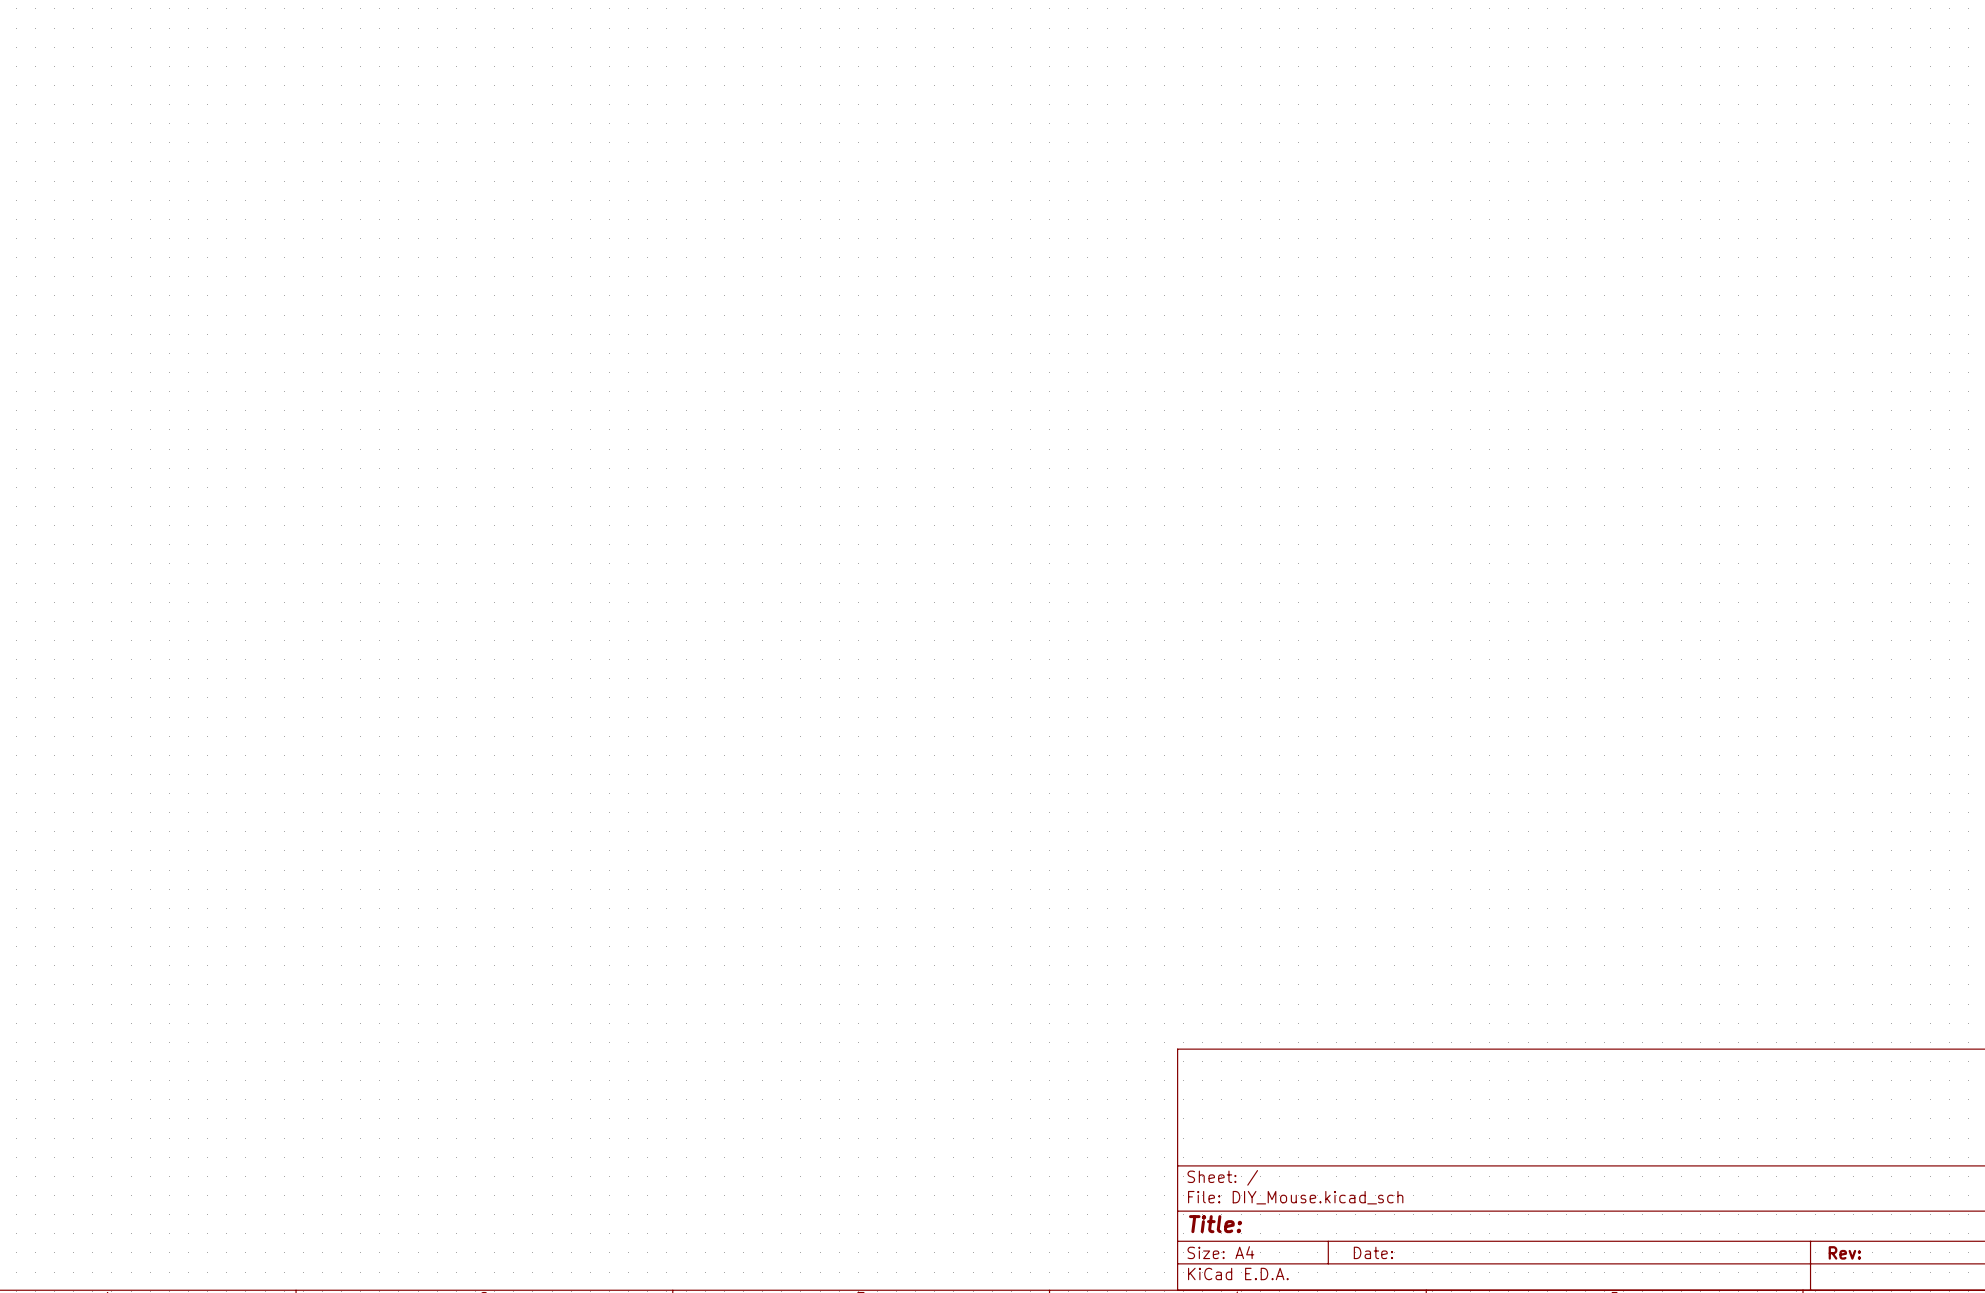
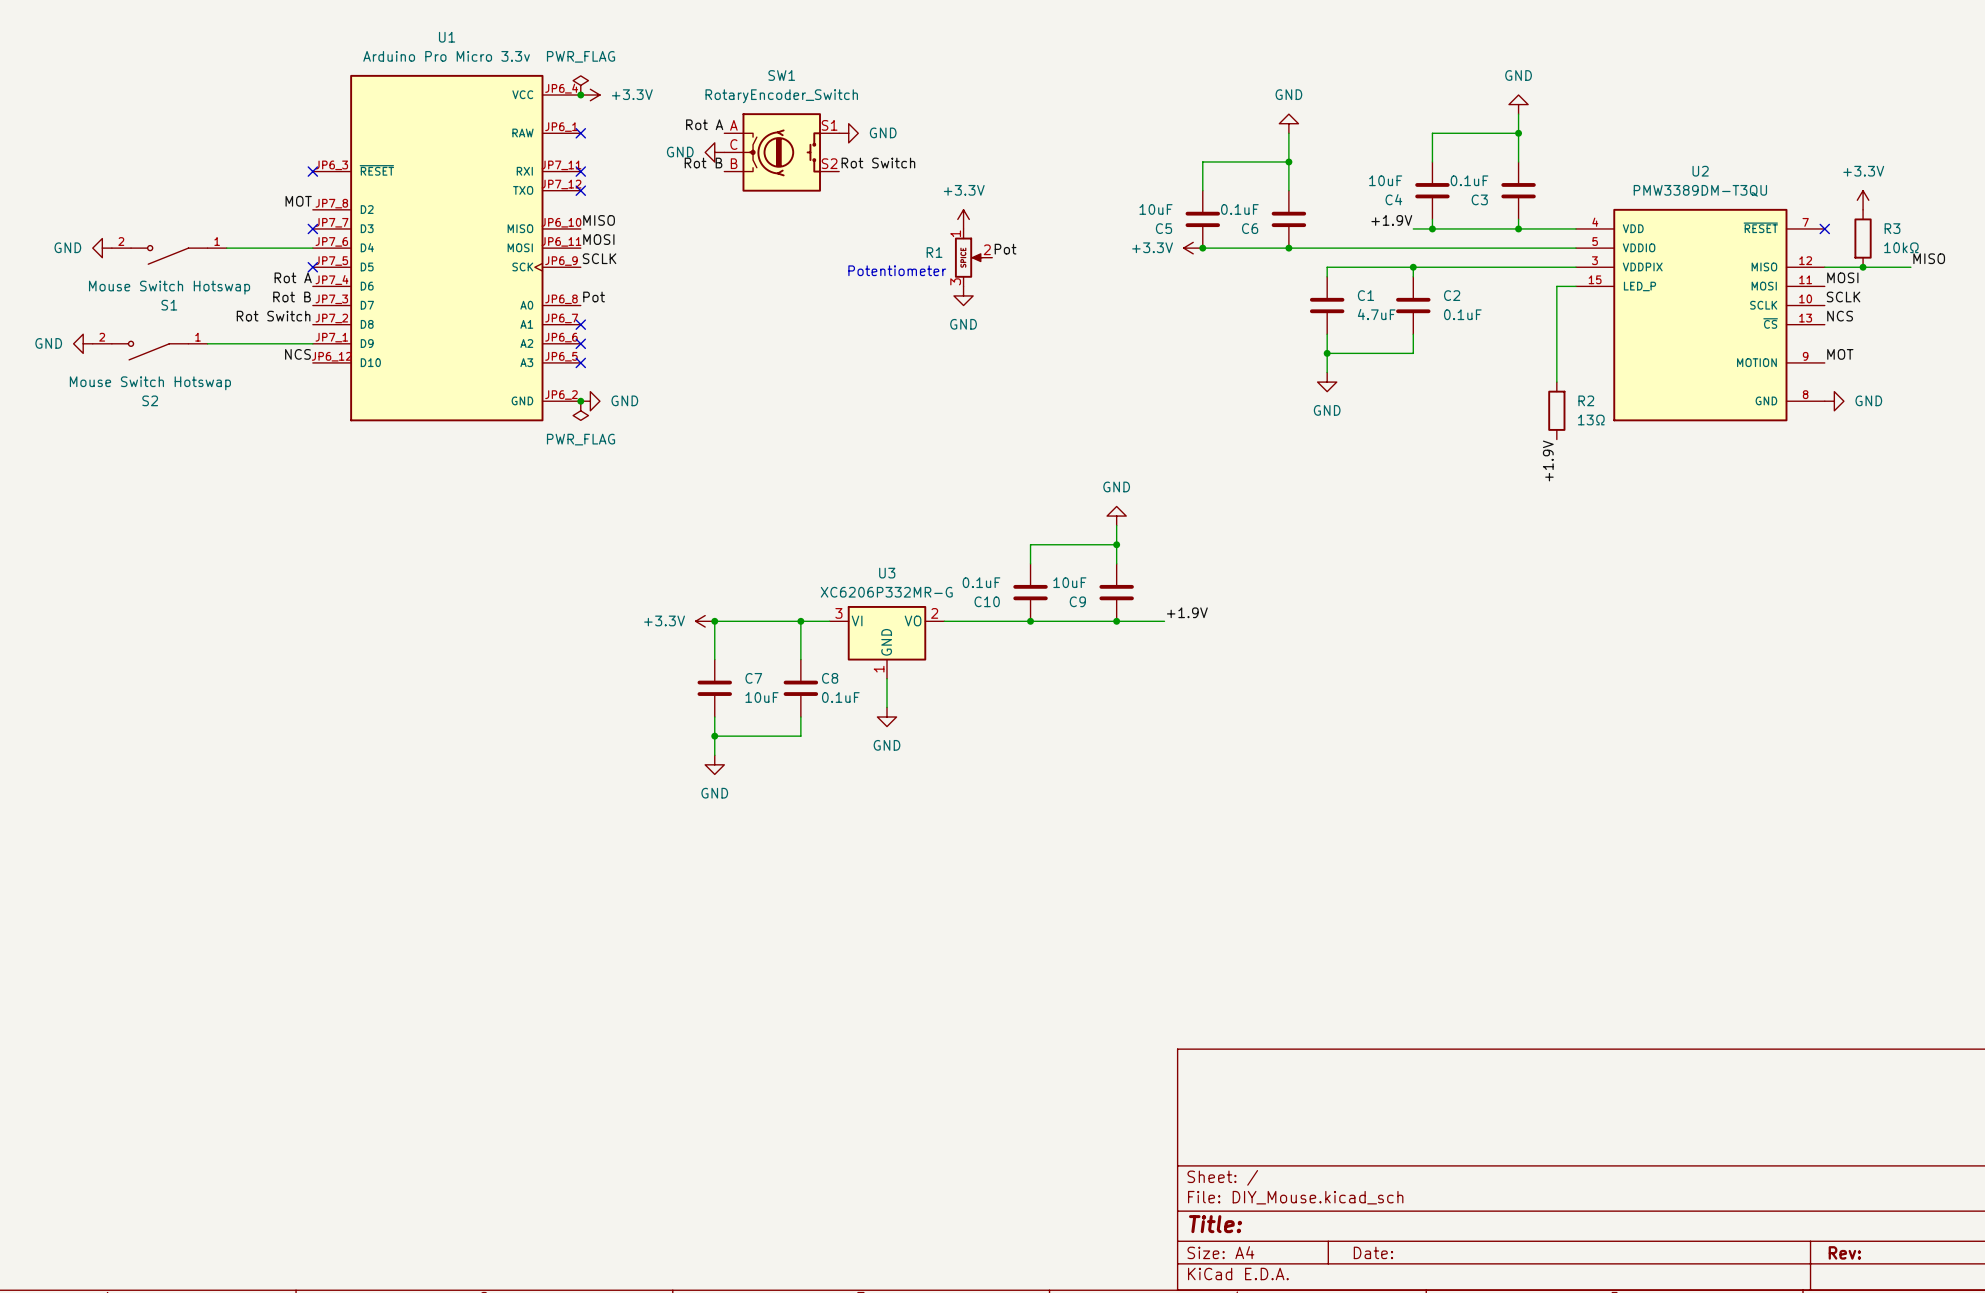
power symbol: none -> PWR_FLAG (580, 85)
junction: none -> (580, 95)
power symbol: none -> +3.3V (590, 95)
power symbol: none -> GND (1518, 104)
wire: none -> (1518, 114) (1518, 161)
power symbol: none -> GND (1288, 123)
label: none -> Rot A (704, 124)
no-connect mark: none -> (580, 133)
power symbol: none -> GND (848, 133)
wire: none -> (1288, 133) (1288, 190)
wire: none -> (1518, 133) (1432, 133) (1432, 161)
junction: none -> (1518, 133)
power symbol: none -> GND (714, 152)
SW1: none -> RotaryEncoder_Switch (781, 152)
wire: none -> (1288, 161) (1202, 161) (1202, 190)
junction: none -> (1288, 161)
label: none -> Rot B (703, 163)
label: none -> Rot Switch (878, 163)
no-connect mark: none -> (312, 171)
no-connect mark: none -> (580, 171)
no-connect mark: none -> (580, 190)
C4: none -> 10uF (1432, 190)
C3: none -> 0.1uF (1518, 190)
power symbol: none -> +3.3V (1863, 200)
label: none -> MOT (298, 201)
power symbol: none -> +3.3V (963, 219)
C5: none -> 10uF (1202, 219)
C6: none -> 0.1uF (1288, 219)
wire: none -> (1432, 219) (1432, 228)
wire: none -> (1518, 219) (1518, 228)
label: none -> MISO (599, 220)
label: none -> +1.9V (1391, 220)
no-connect mark: none -> (312, 228)
wire: none -> (1413, 228) (1575, 228)
junction: none -> (1432, 228)
junction: none -> (1518, 228)
no-connect mark: none -> (1824, 228)
R3: none -> 10kΩ (1863, 238)
label: none -> MOSI (598, 239)
power symbol: none -> GND (102, 248)
wire: none -> (226, 248) (312, 248)
U1: none -> Arduino Pro Micro 3.3v (446, 248)
power symbol: none -> +3.3V (1193, 248)
wire: none -> (1202, 248) (1575, 248)
junction: none -> (1202, 248)
junction: none -> (1288, 248)
label: none -> Pot (1005, 249)
S1: none -> Mouse Switch Hotswap (169, 254)
R1: none -> (973, 257)
label: none -> SCLK (599, 258)
label: none -> MISO (1929, 258)
no-connect mark: none -> (312, 267)
wire: none -> (1413, 267) (1413, 276)
junction: none -> (1413, 267)
wire: none -> (1575, 267) (1327, 267) (1327, 276)
wire: none -> (1824, 267) (1910, 267)
junction: none -> (1863, 267)
text: none -> Potentiometer (897, 270)
label: none -> Rot A (293, 277)
label: none -> MOSI (1842, 277)
wire: none -> (1575, 286) (1556, 286) (1556, 382)
power symbol: none -> GND (963, 295)
label: none -> Rot B (292, 296)
label: none -> Pot (594, 296)
label: none -> SCLK (1843, 296)
C1: none -> 4.7uF (1327, 305)
C2: none -> 0.1uF (1413, 305)
U2: none -> PMW3389DM-T3QU (1700, 315)
label: none -> Rot Switch (273, 316)
label: none -> NCS (1840, 316)
no-connect mark: none -> (580, 324)
wire: none -> (1327, 334) (1327, 372)
wire: none -> (1413, 334) (1413, 353) (1327, 353)
power symbol: none -> GND (83, 343)
wire: none -> (207, 343) (312, 343)
no-connect mark: none -> (580, 343)
S2: none -> Mouse Switch Hotswap (150, 350)
junction: none -> (1327, 353)
label: none -> NCS (297, 354)
label: none -> MOT (1840, 354)
no-connect mark: none -> (580, 362)
power symbol: none -> GND (1327, 382)
junction: none -> (580, 401)
power symbol: none -> GND (590, 401)
power symbol: none -> GND (1834, 401)
power symbol: none -> PWR_FLAG (580, 410)
R2: none -> 13Ω (1556, 410)
label: none -> +1.9V (1548, 460)
power symbol: none -> GND (1116, 516)
wire: none -> (1116, 525) (1116, 563)
wire: none -> (1116, 544) (1030, 544) (1030, 563)
junction: none -> (1116, 544)
C10: none -> 0.1uF (1030, 592)
C9: none -> 10uF (1116, 592)
label: none -> +1.9V (1187, 612)
power symbol: none -> +3.3V (705, 621)
junction: none -> (714, 621)
wire: none -> (800, 621) (800, 659)
junction: none -> (800, 621)
wire: none -> (829, 621) (714, 621) (714, 659)
wire: none -> (944, 621) (1164, 621)
junction: none -> (1030, 621)
junction: none -> (1116, 621)
U3: none -> XC6206P332MR-G (887, 642)
wire: none -> (887, 678) (887, 707)
C7: none -> 10uF (714, 688)
C8: none -> 0.1uF (800, 688)
wire: none -> (714, 717) (714, 755)
wire: none -> (800, 717) (800, 736) (714, 736)
power symbol: none -> GND (887, 717)
junction: none -> (714, 736)
power symbol: none -> GND (714, 764)

